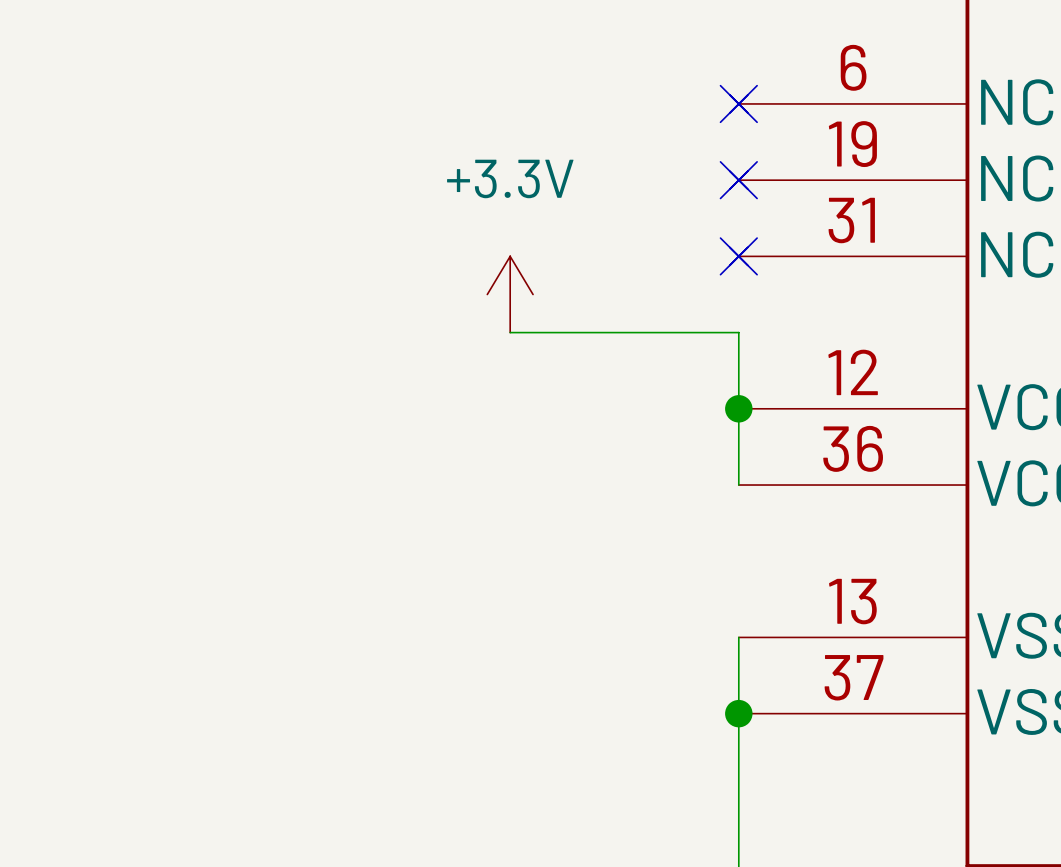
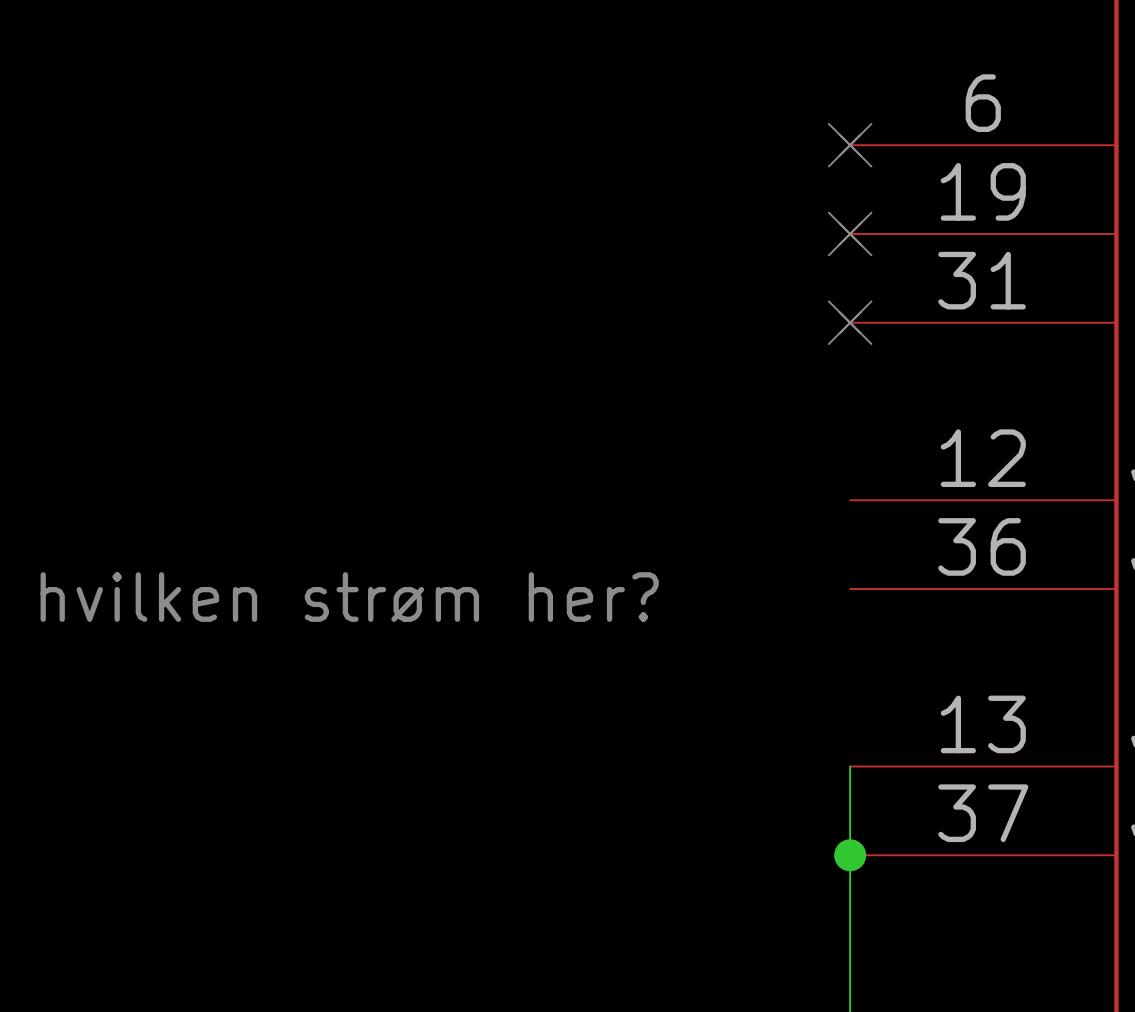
power symbol: +3.3V (510, 294) -> none
wire: (510, 332) (738, 332) (738, 485) -> none
junction: (738, 408) -> none
text: none -> hvilken strøm her? (349, 597)

